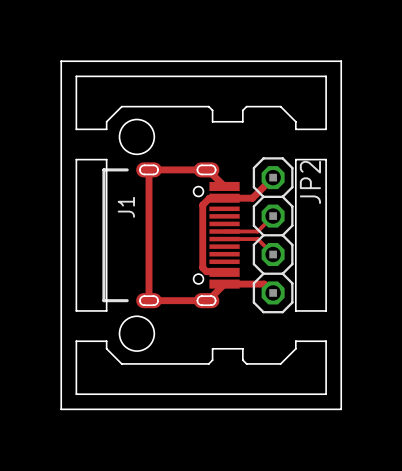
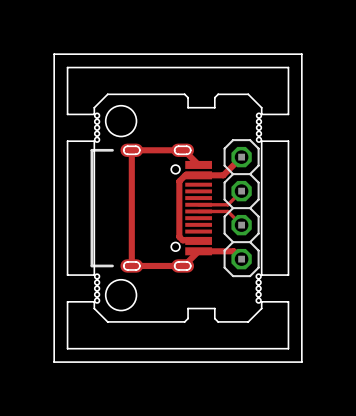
hole: none -> (97, 115)
hole: none -> (258, 115)
hole: none -> (97, 121)
hole: none -> (258, 121)
hole: none -> (97, 127)
hole: none -> (258, 127)
hole: none -> (97, 133)
hole: none -> (258, 133)
hole: none -> (97, 139)
hole: none -> (258, 139)
JP2 name: JP2 (310, 182) -> none
J1 name: J1 (126, 207) -> none
hole: none -> (97, 276)
hole: none -> (258, 276)
hole: none -> (97, 282)
hole: none -> (258, 282)
hole: none -> (97, 288)
hole: none -> (258, 288)
hole: none -> (97, 294)
hole: none -> (258, 294)
hole: none -> (97, 300)
hole: none -> (258, 300)

